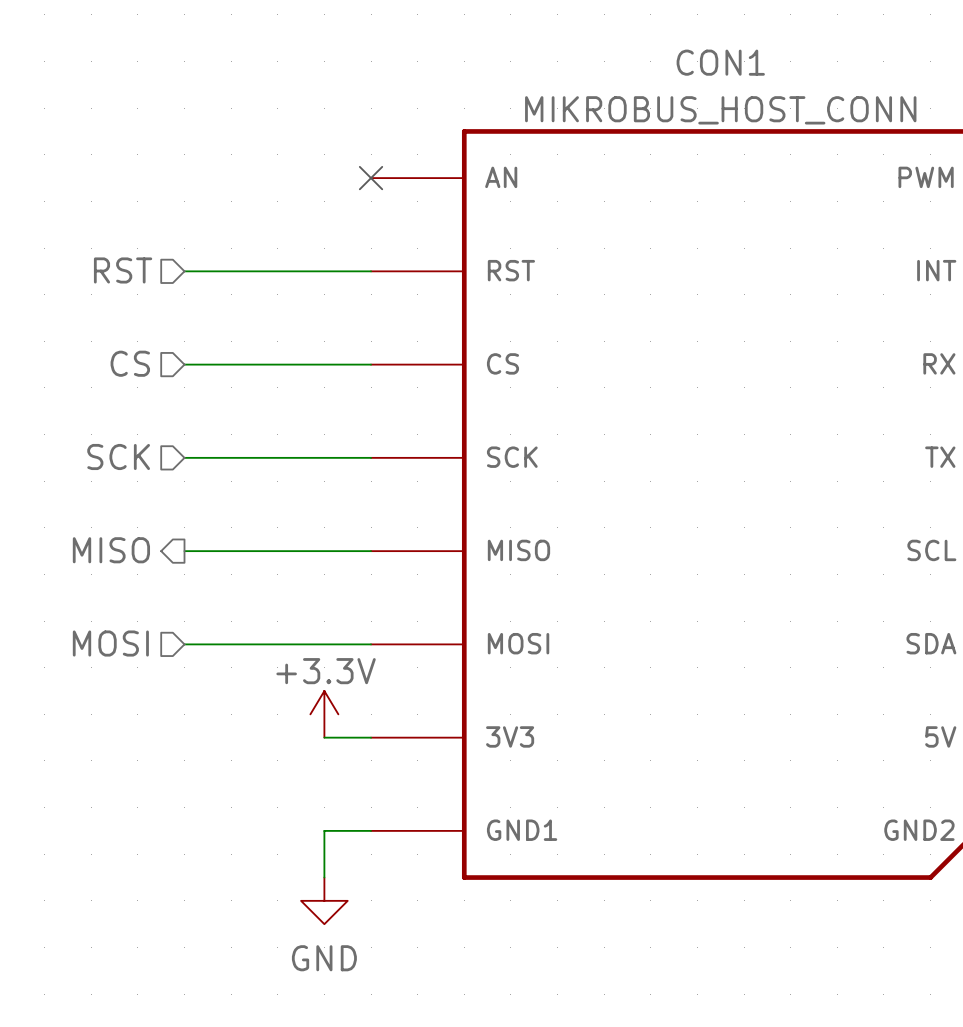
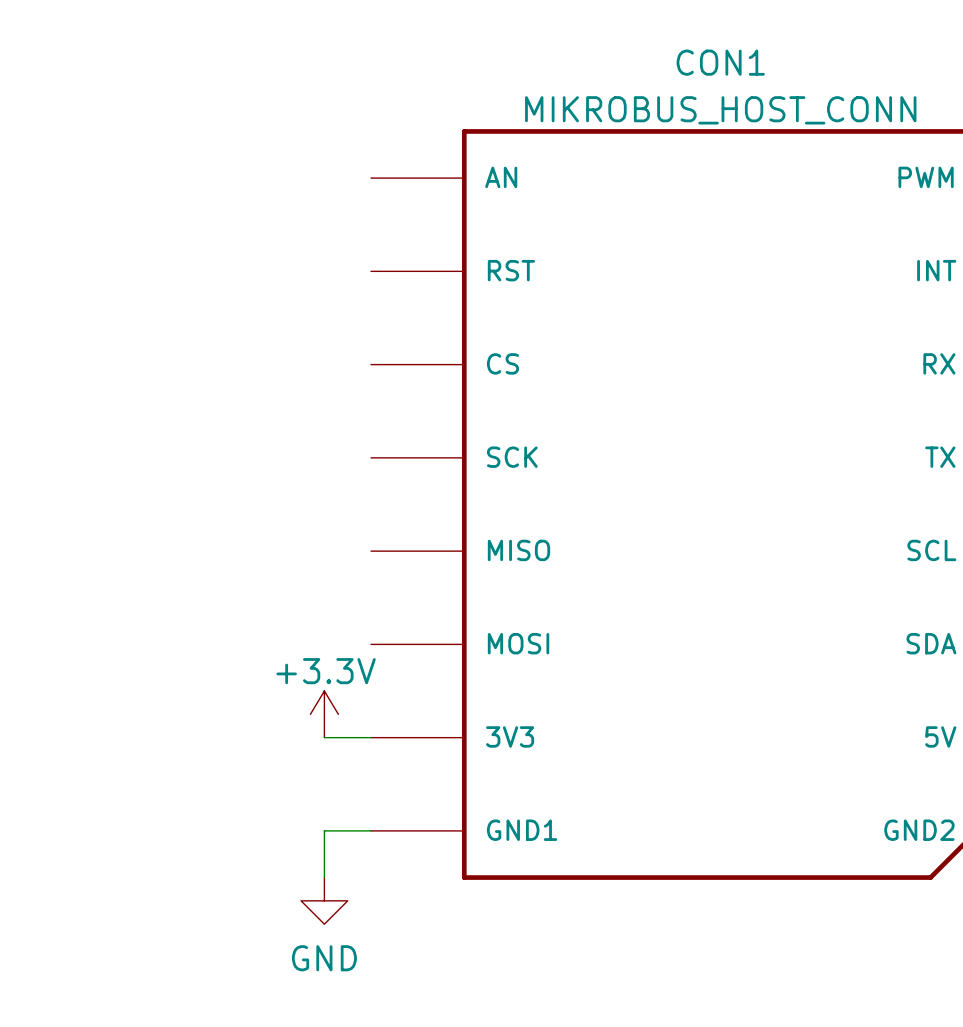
no-connect mark: (371, 178) -> none
hierarchical label: RST (123, 270) -> none
wire: (184, 271) (371, 271) -> none
hierarchical label: CS (130, 363) -> none
wire: (184, 364) (371, 364) -> none
hierarchical label: SCK (118, 456) -> none
wire: (184, 457) (371, 457) -> none
hierarchical label: MISO (111, 550) -> none
wire: (184, 551) (371, 551) -> none
hierarchical label: MOSI (110, 643) -> none
wire: (184, 644) (371, 644) -> none

